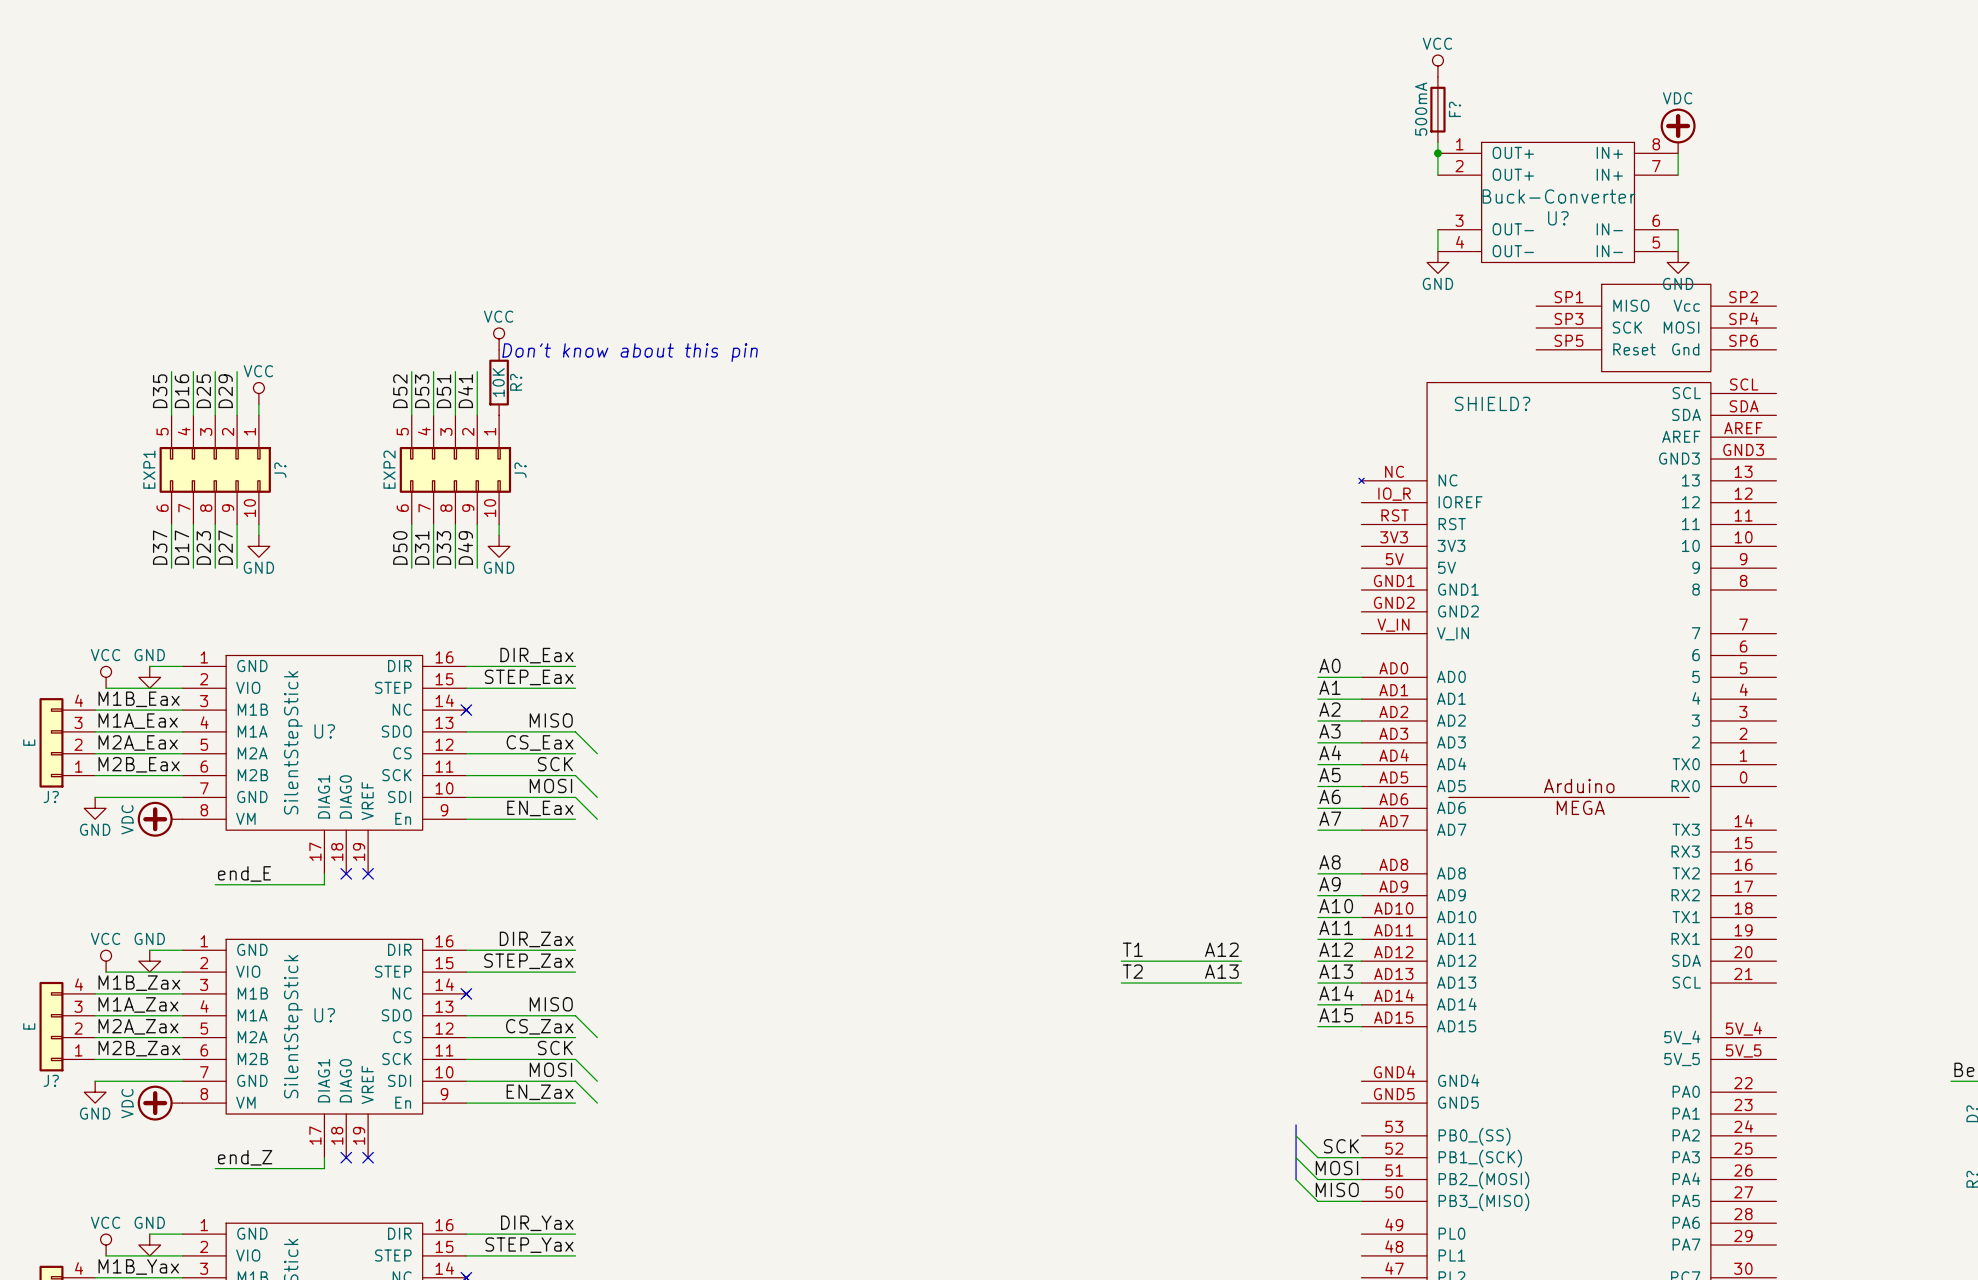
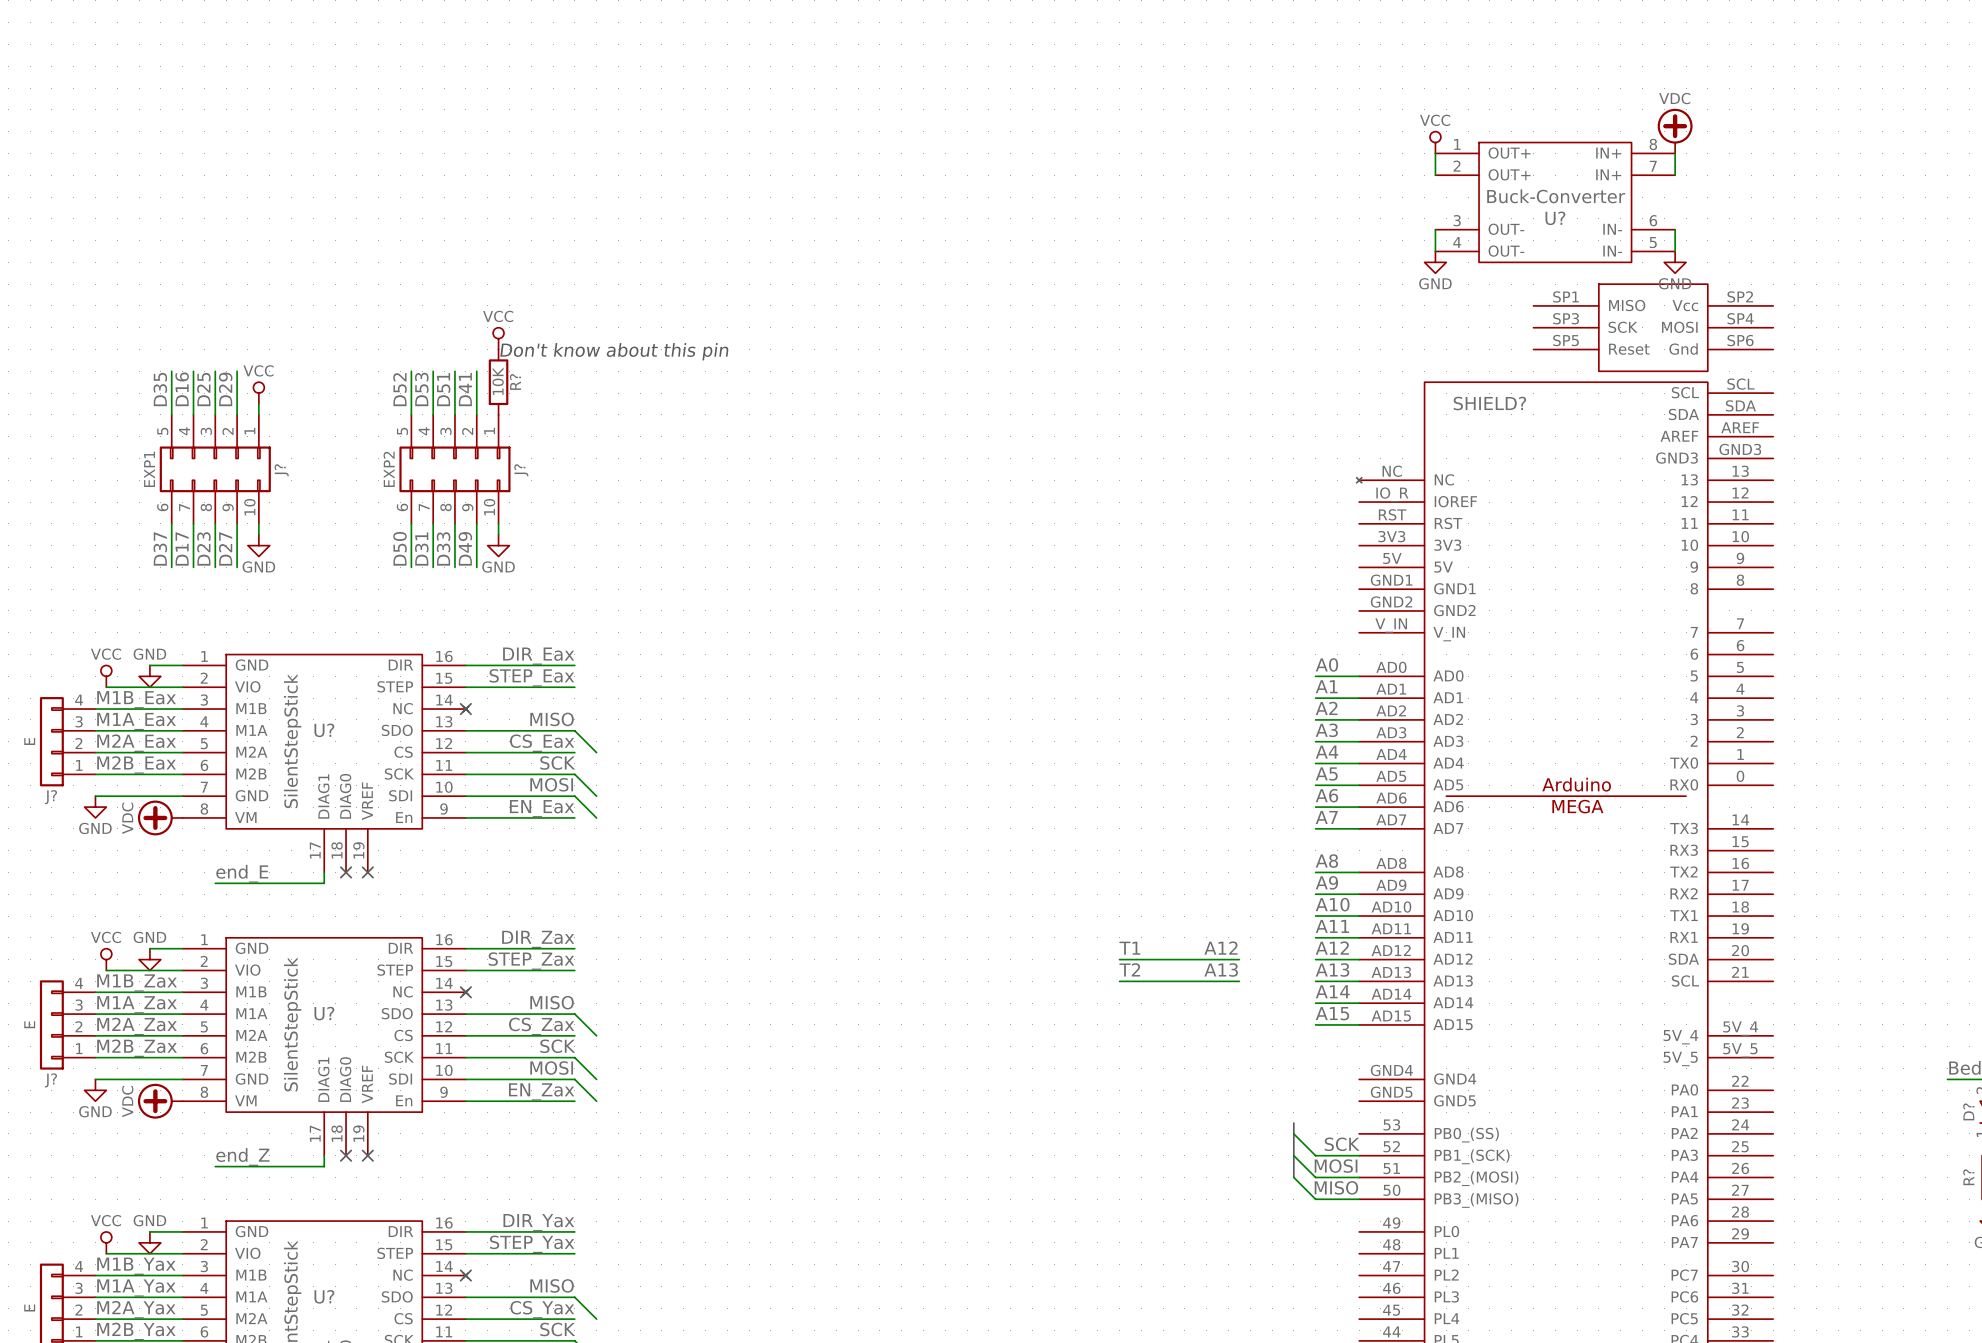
power symbol position: VCC (1437, 65) -> VCC (1435, 142)
F?: 500mA (1437, 109) -> none
junction: (1437, 153) -> none

